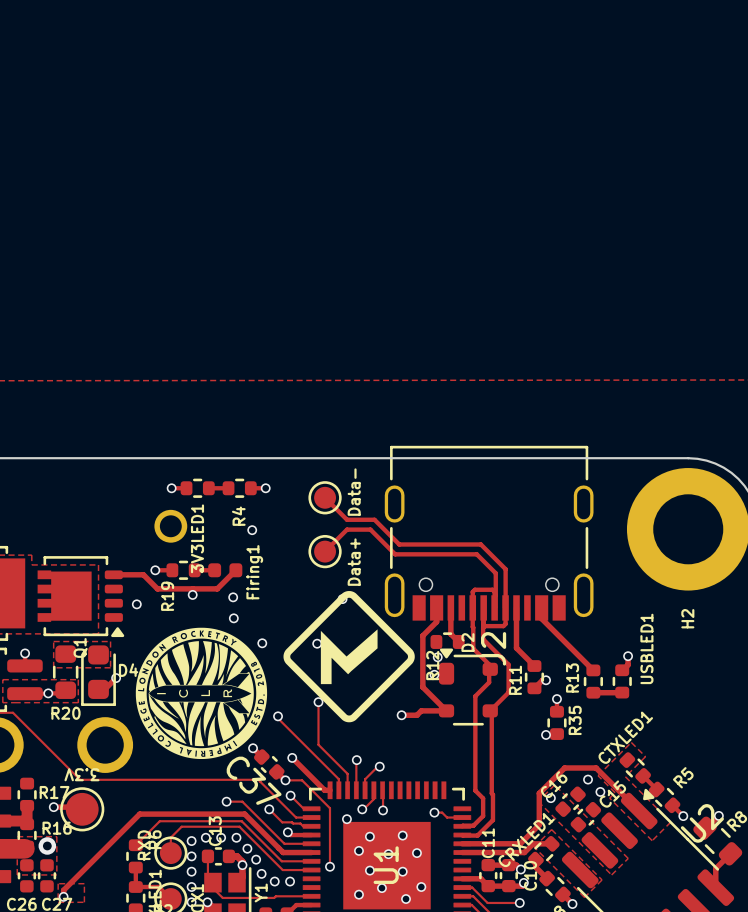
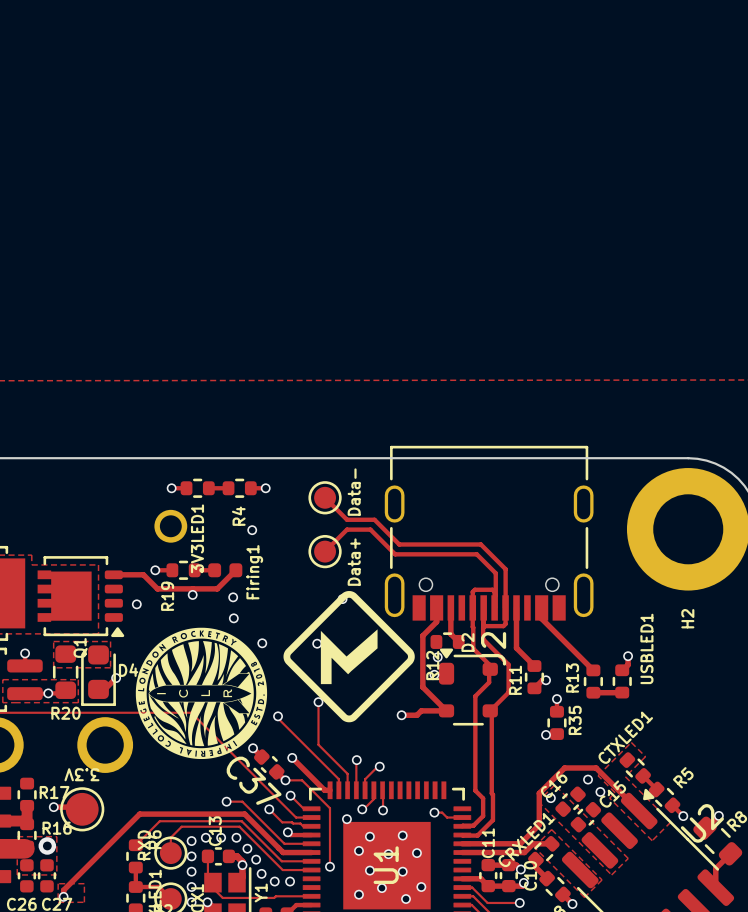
track: (13, 712) (80, 779) (258, 779) -> (13, 712) (191, 712) (258, 779)

